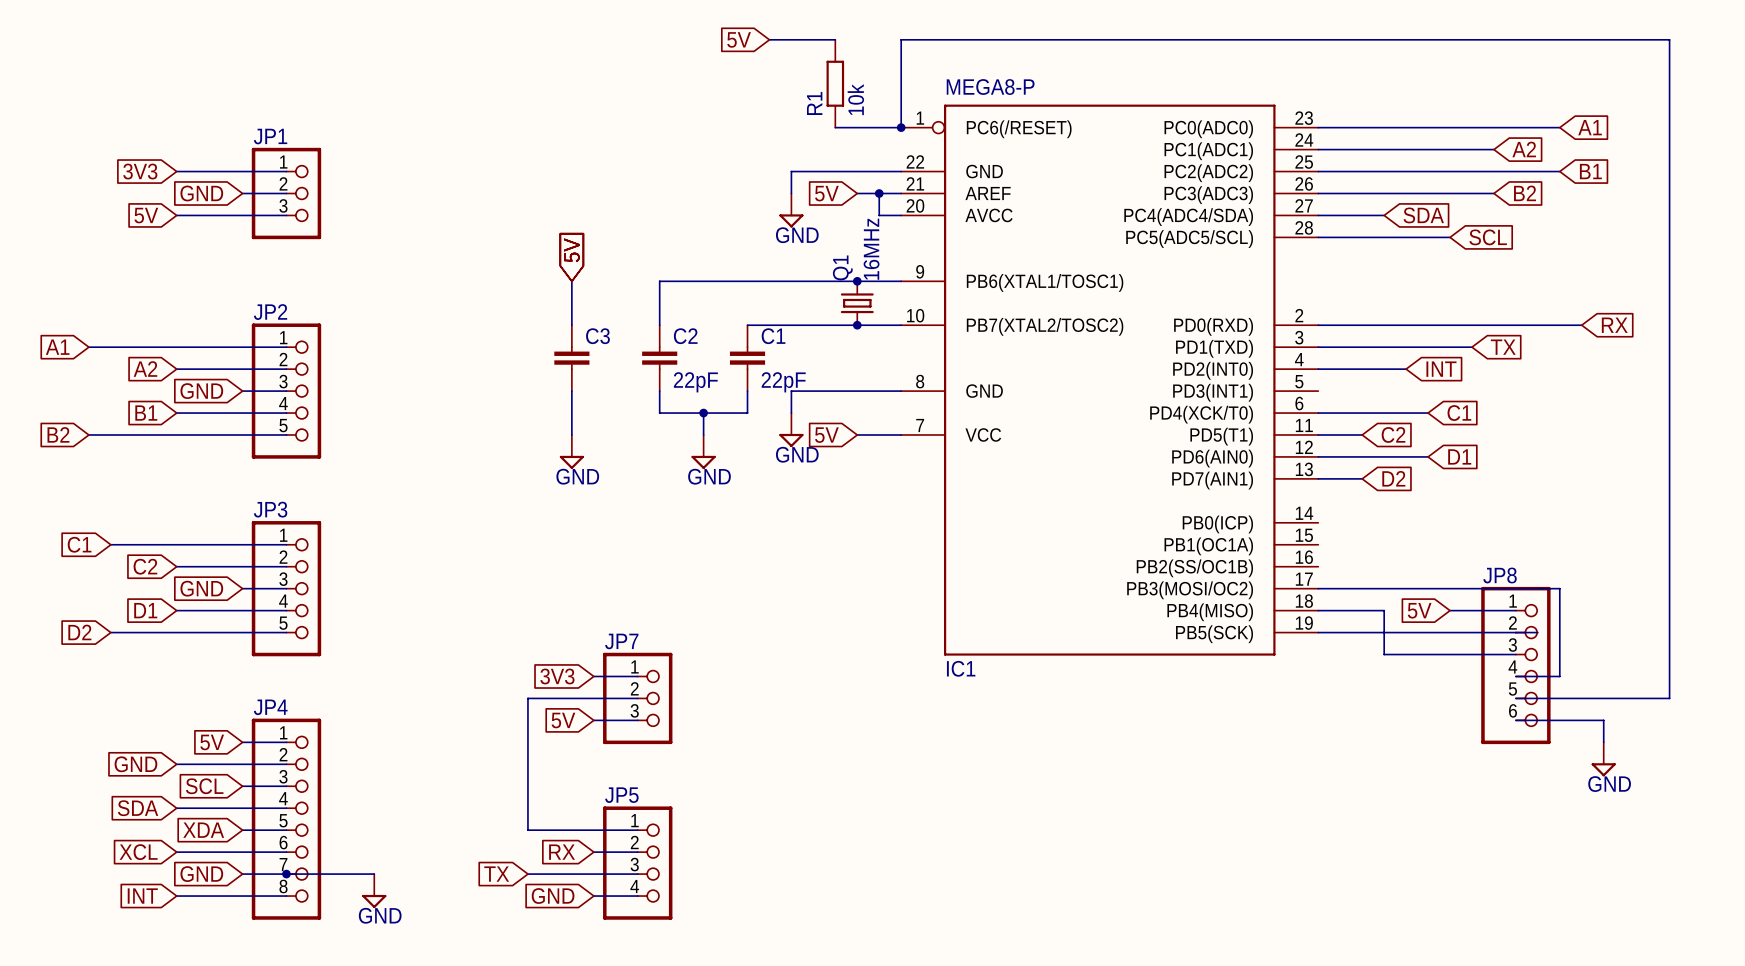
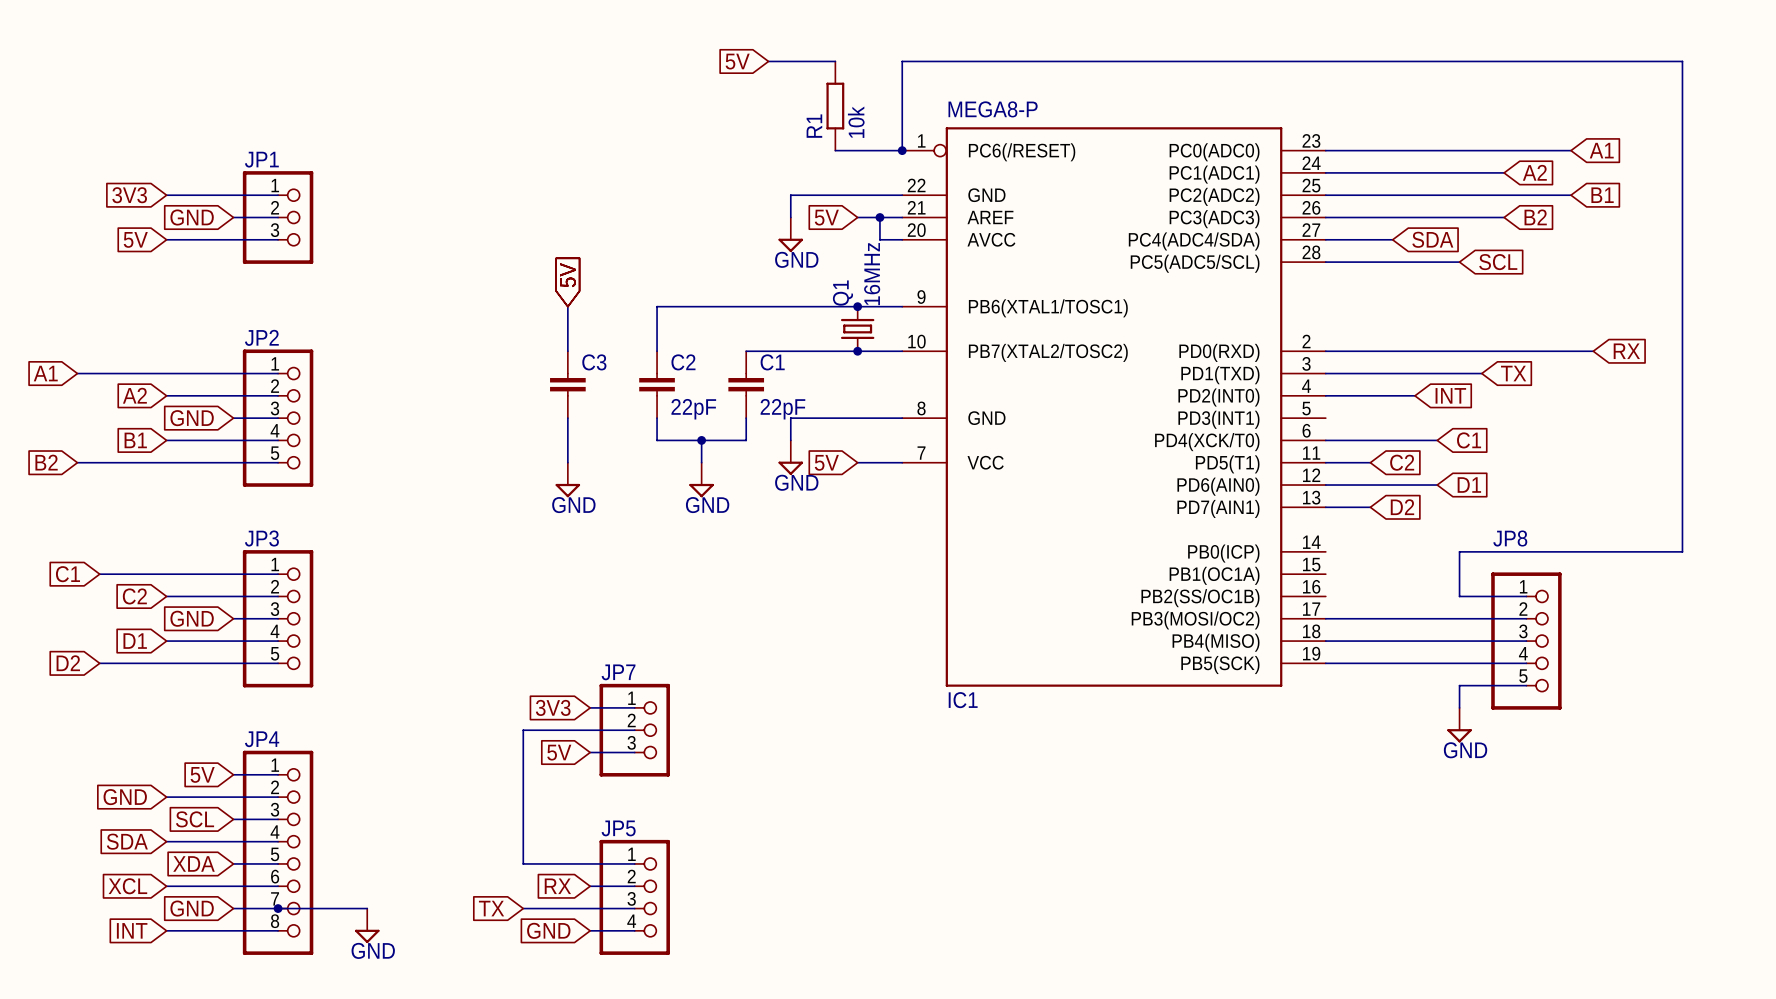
wire: (1669, 522) (1669, 698) (1515, 698) -> (1682, 551) (1459, 551) (1459, 596) (1526, 596)
JP8 symbol: [1481, 586, 1551, 745] -> [1491, 572, 1562, 710]
wire: (1515, 588) (1559, 588) (1559, 676) (1515, 676) -> none
wire: (1384, 610) (1384, 654) (1450, 654) -> (1392, 641) (1459, 641)
global label: 5V (1419, 610) -> none
wire: none -> (1459, 685) (1459, 707)
wire: (1515, 720) (1603, 720) (1603, 742) -> none
power symbol position: GND (1603, 759) -> GND (1459, 725)

